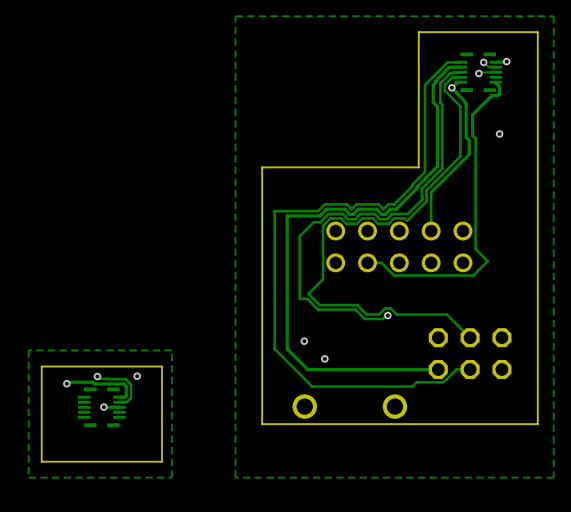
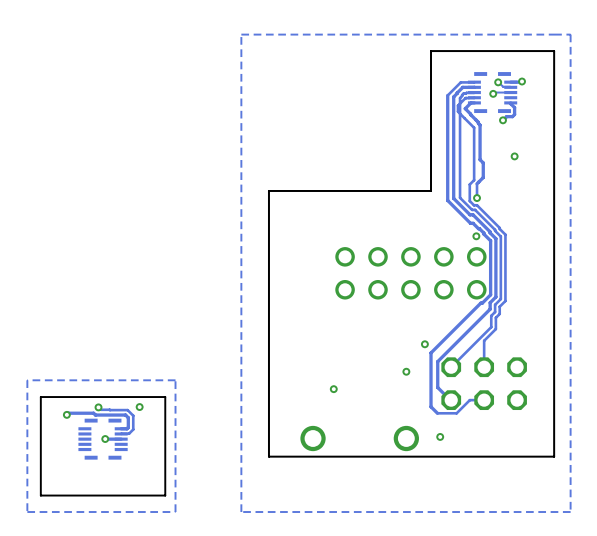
track: (444, 72) (433, 85) (433, 102) (437, 106) (437, 166) (396, 209) (390, 209) (385, 214) (381, 214) (376, 209) (358, 209) (353, 214) (350, 214) (344, 209) (326, 209) (319, 215) (287, 215) (287, 348) (307, 369) (438, 369) -> (457, 92) (453, 96) (453, 198) (470, 214) (473, 214) (495, 238) (495, 297) (490, 302) (490, 309) (437, 361) (437, 387) (451, 400)
track: (448, 74) (440, 83) (442, 168) (421, 188) (422, 199) (407, 213) (392, 213) (386, 219) (379, 219) (374, 213) (360, 213) (355, 219) (348, 219) (342, 213) (328, 213) (320, 222) (313, 222) (299, 236) (299, 298) (307, 298) (317, 309) (355, 309) (364, 318) (382, 318) (387, 315) -> (462, 95) (460, 98) (460, 197) (472, 209) (475, 209) (500, 236) (500, 299) (495, 304) (495, 312) (491, 315) (491, 327) (451, 367)
track: (434, 75) (425, 84) (425, 172) (394, 204) (388, 204) (383, 209) (378, 204) (356, 204) (351, 209) (346, 204) (324, 204) (317, 211) (274, 211) (274, 348) (312, 386) (412, 386) (416, 382) (425, 382) -> (447, 95) (447, 200) (490, 240) (490, 294) (431, 352) (431, 406) (437, 413)
via position: (451, 87) -> (502, 120)
track: (488, 99) (472, 114) (472, 135) (475, 138) (475, 249) (487, 261) (473, 275) (394, 275) (381, 262) (367, 262) -> none
track: (460, 156) (426, 190) (426, 201) (407, 220) (404, 218) (394, 218) (388, 223) (378, 223) (372, 218) (362, 218) (357, 223) (346, 223) (340, 218) (330, 218) (323, 225) (323, 279) (308, 293) (319, 305) (357, 305) (366, 314) (378, 314) (384, 308) (390, 308) (396, 314) (446, 314) (470, 337) -> (474, 179) (469, 184) (469, 201) (474, 205) (477, 205) (505, 234) (505, 300) (499, 306) (499, 313) (495, 317) (495, 329) (484, 340) (484, 367)
track: (463, 160) (431, 192) (431, 231) -> (477, 183) (477, 198)
via: none -> (477, 198)
via: none -> (476, 236)
via: (387, 315) -> none
via: none -> (424, 344)
via: (304, 341) -> none
via: none -> (406, 371)
via: none -> (440, 436)

